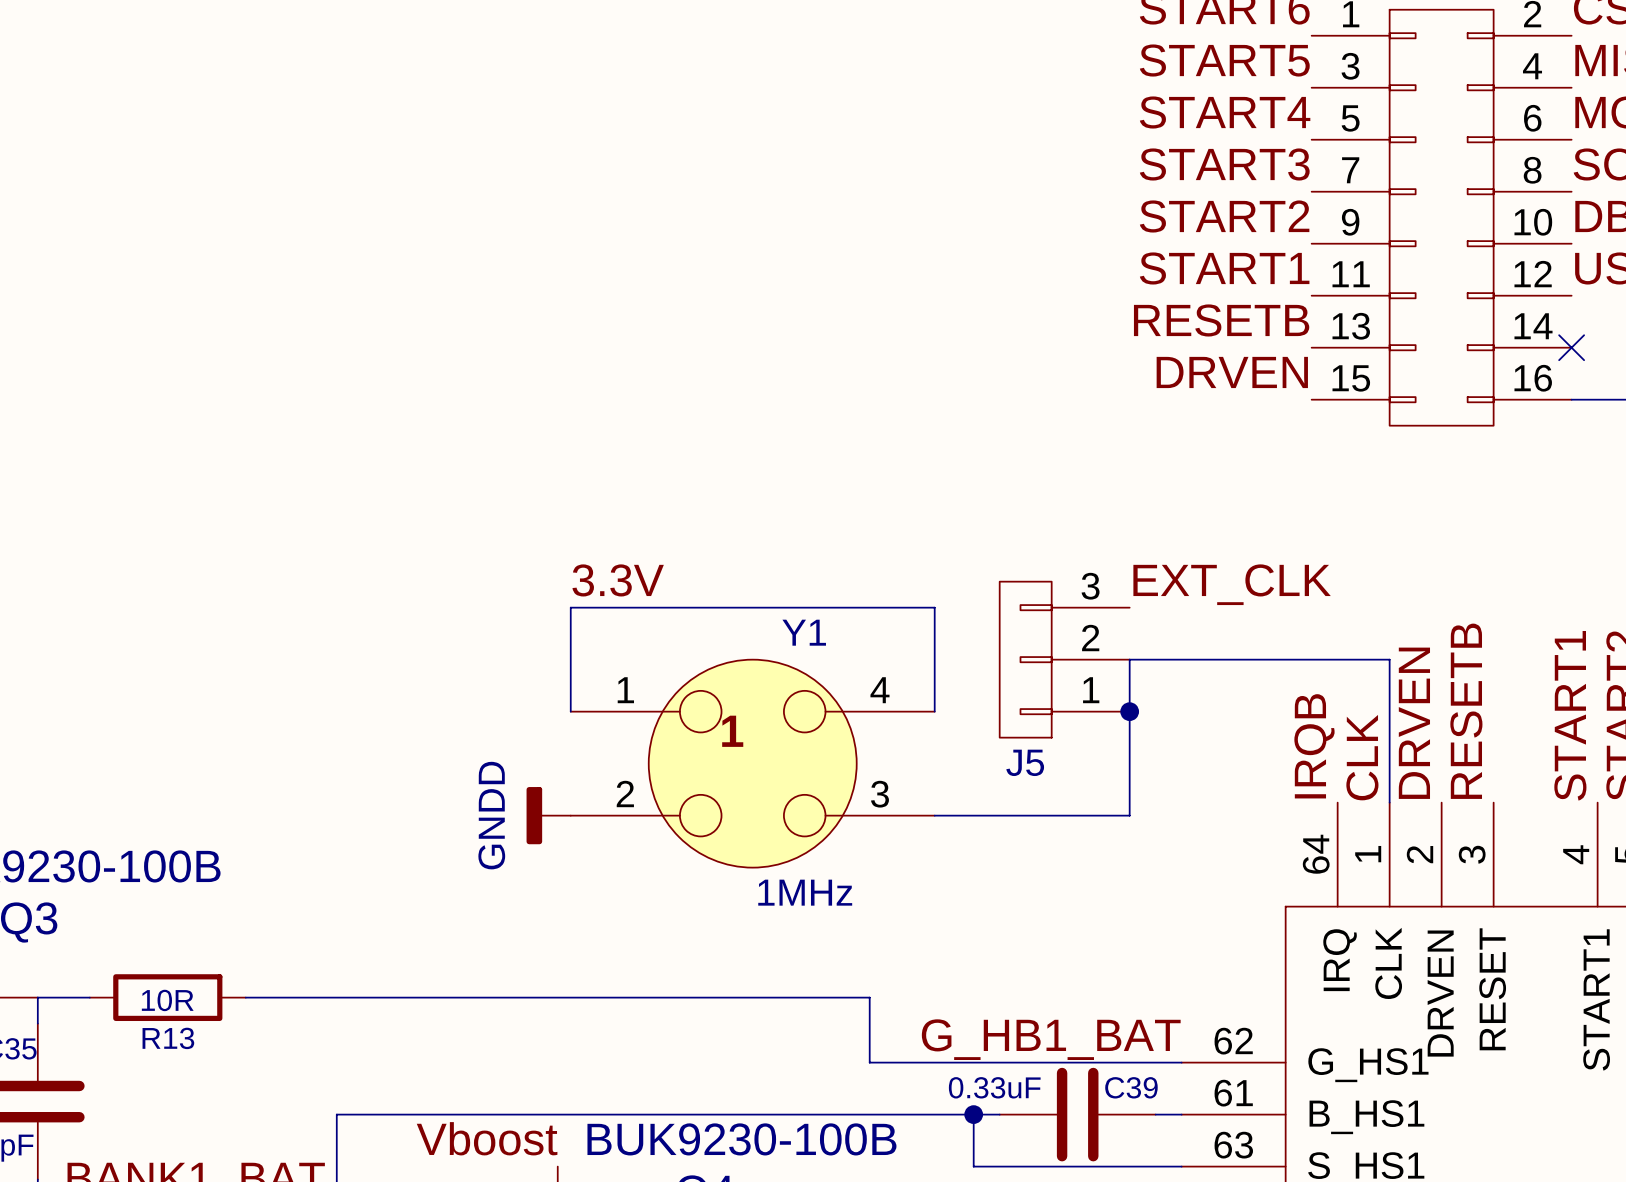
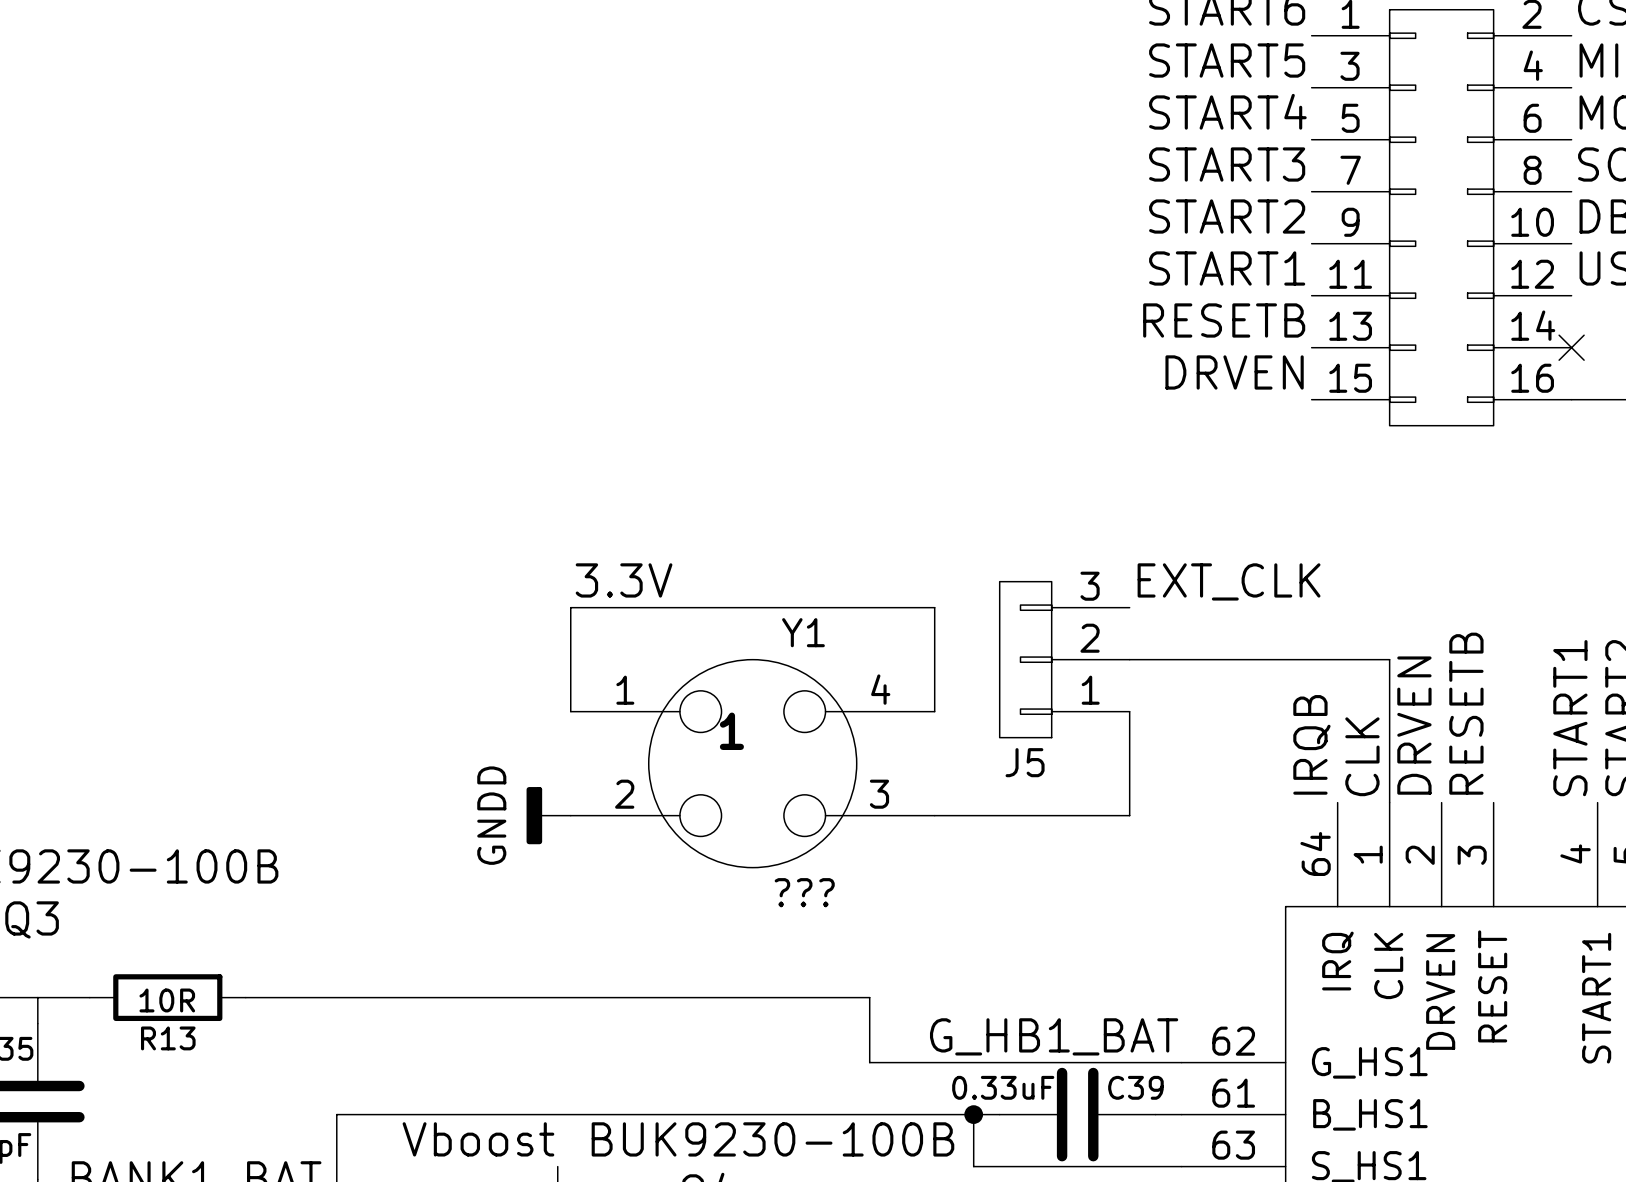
wire: (1129, 659) (1129, 711) -> none
junction: (1129, 711) -> none
Y1 value: 1MHz (805, 892) -> ??? (804, 892)

